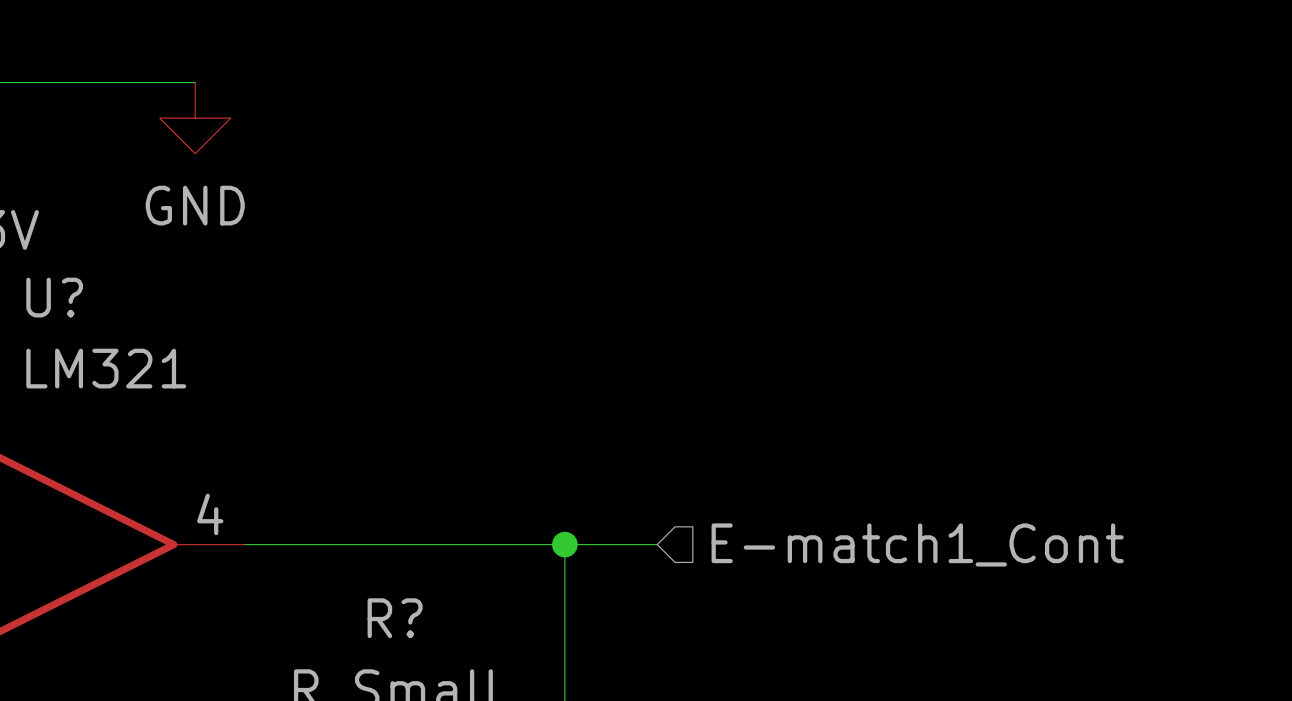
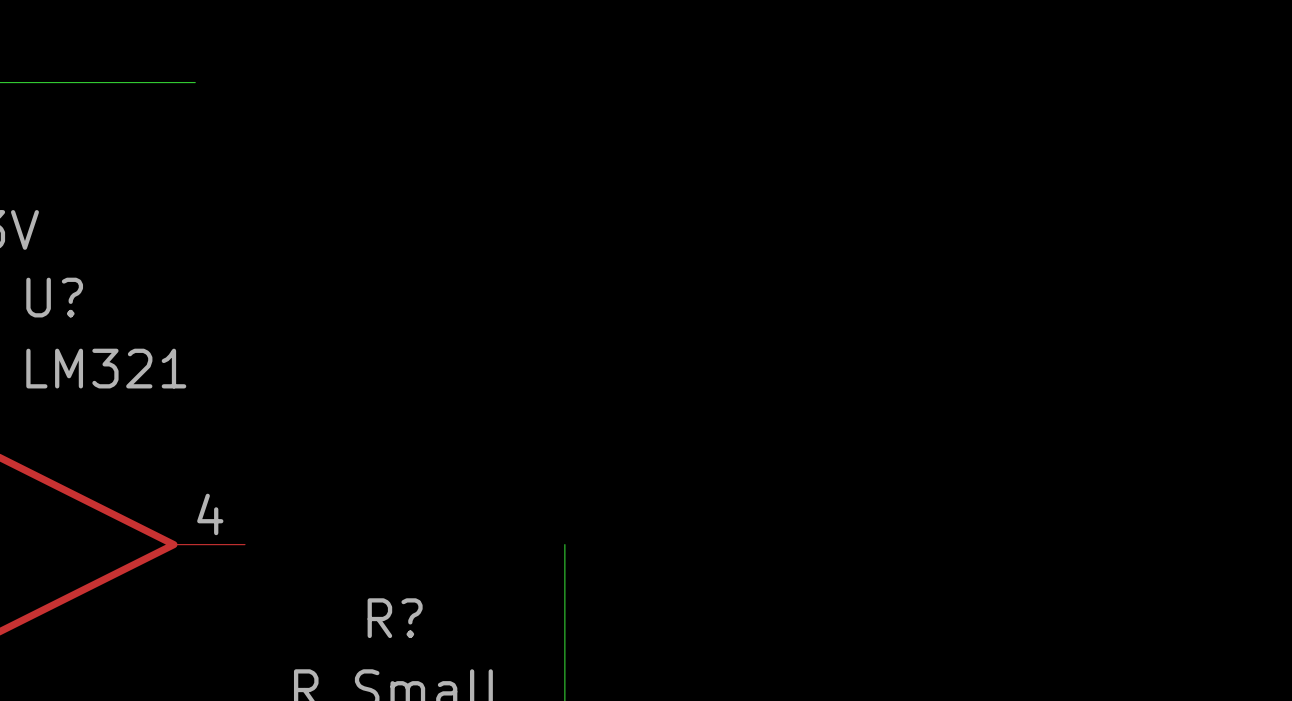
power symbol: GND (195, 118) -> none
wire: (244, 544) (657, 544) -> none
junction: (564, 544) -> none
hierarchical label: E-match1_Cont (917, 544) -> none

